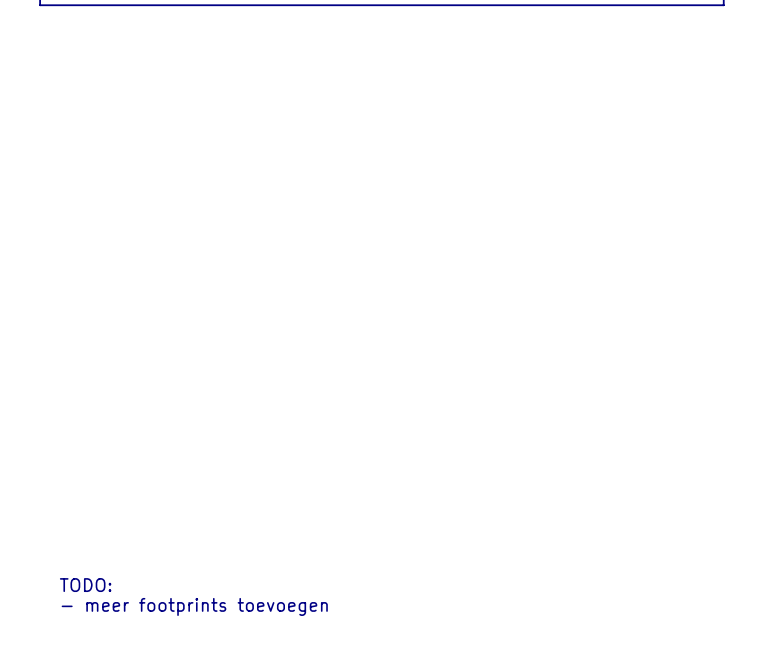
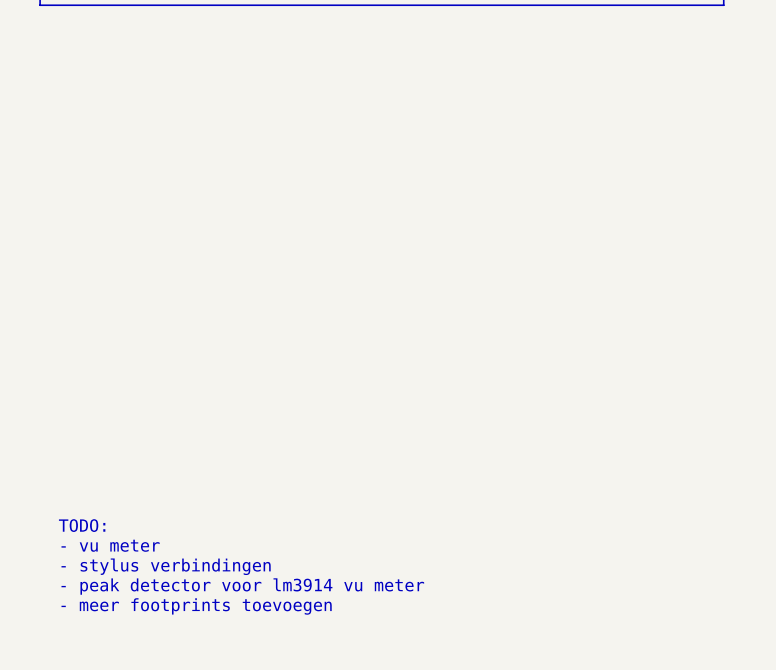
text: none -> TODO: (82, 525)
text: none -> - vu meter (110, 545)
text: none -> - stylus verbindingen (166, 566)
text: TODO: (85, 585) -> - peak detector voor lm3914 vu meter (242, 586)

